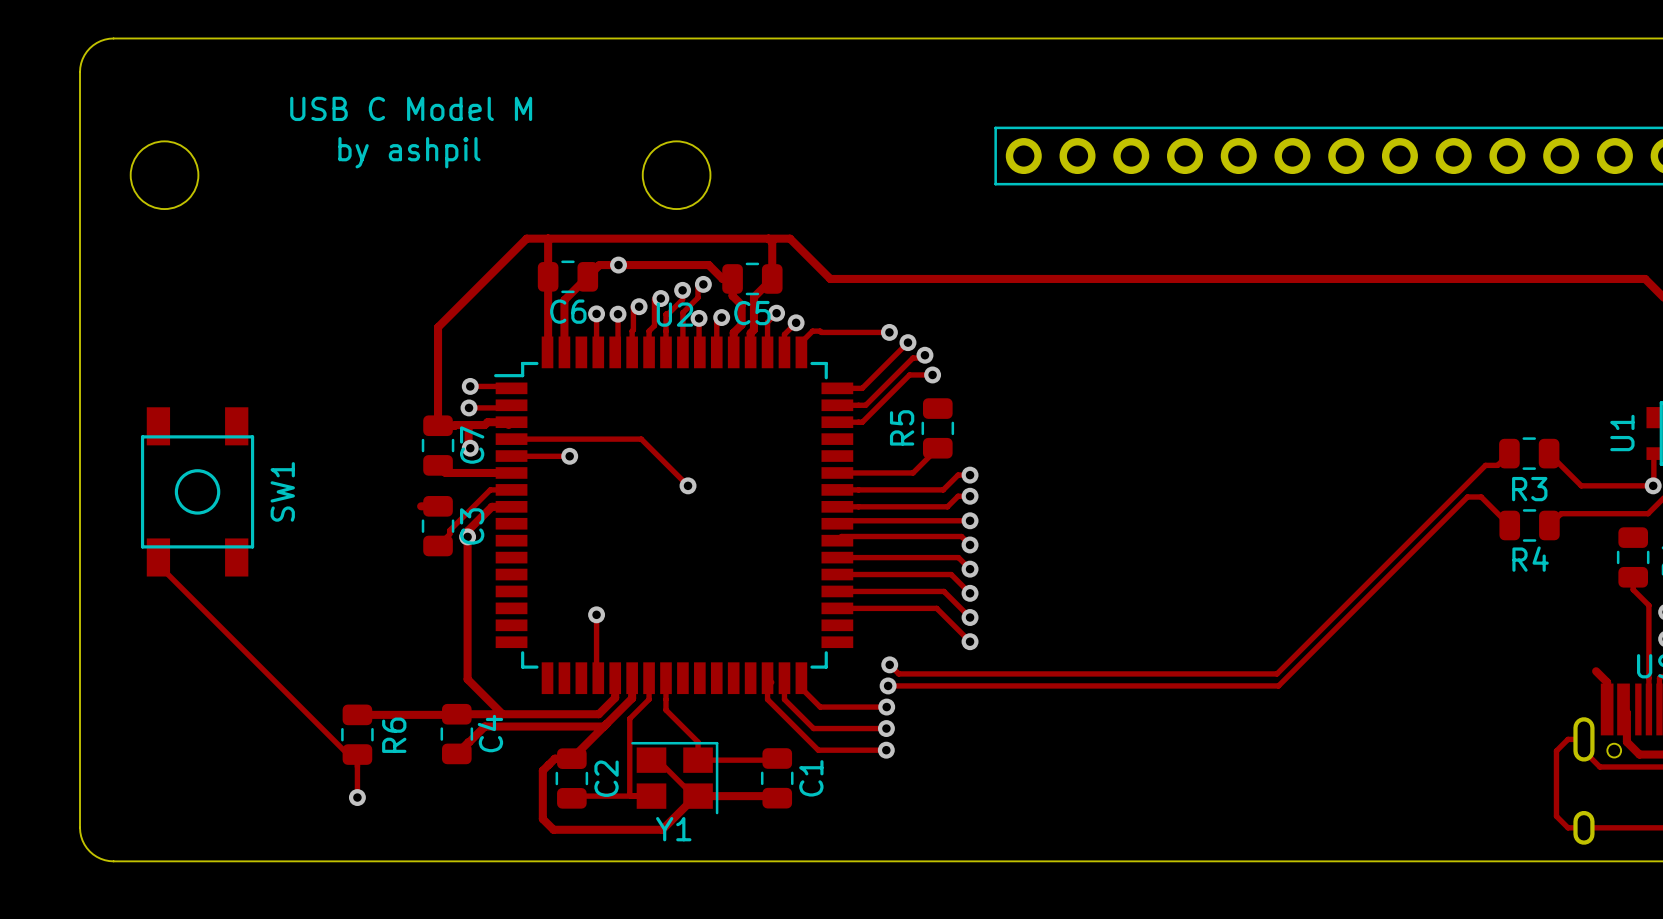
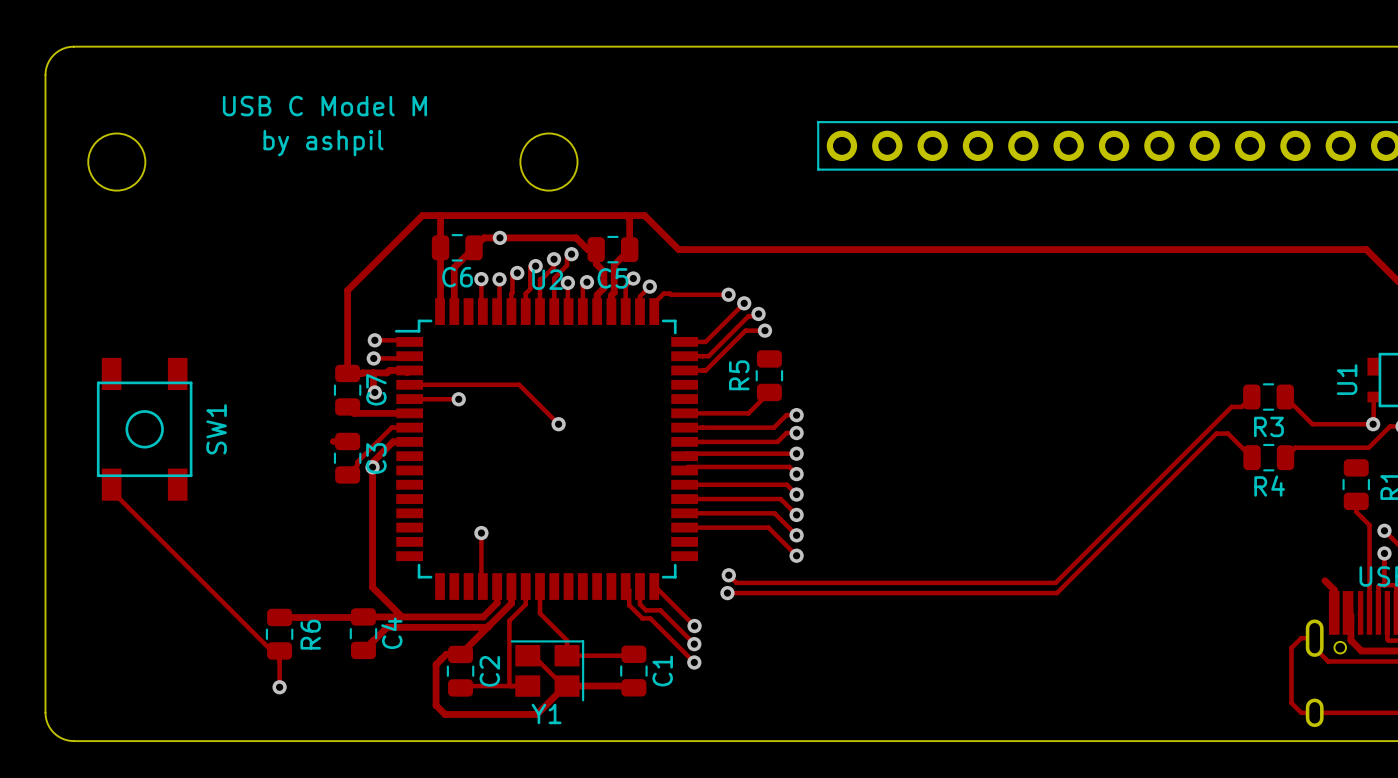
track: (767, 678) (767, 699) (818, 750) (886, 750) -> none
track: (801, 678) (801, 688) (820, 707) (886, 707) -> none
track: none -> (655, 586) (694, 626)
track: none -> (629, 590) (629, 605) (642, 618) (650, 618) (694, 662)
track: (791, 706) (813, 728) (886, 728) -> (645, 610) (660, 610) (694, 644)
via: (886, 707) -> none
via: none -> (694, 626)
via: (886, 728) -> none
via: none -> (694, 644)
via: (886, 750) -> none
via: none -> (694, 662)

